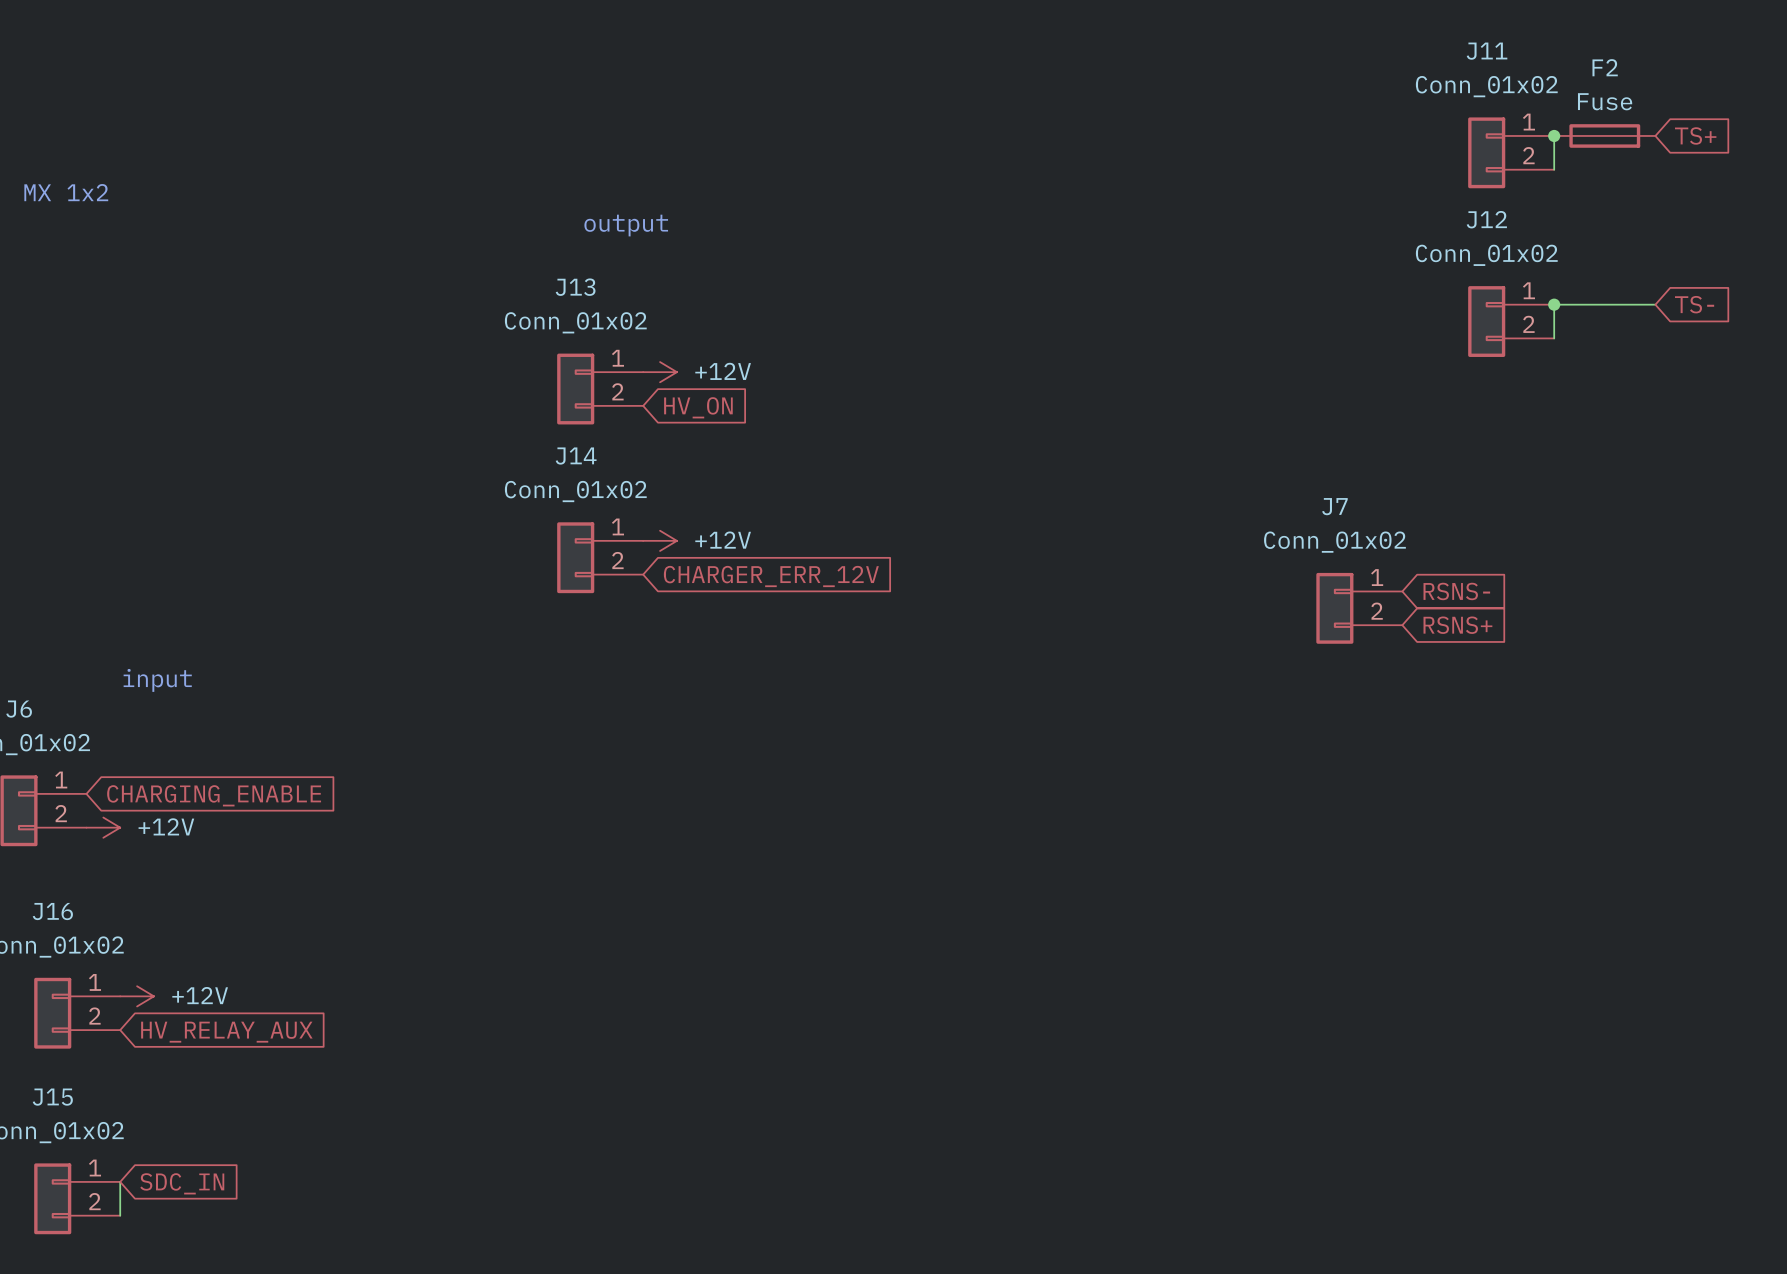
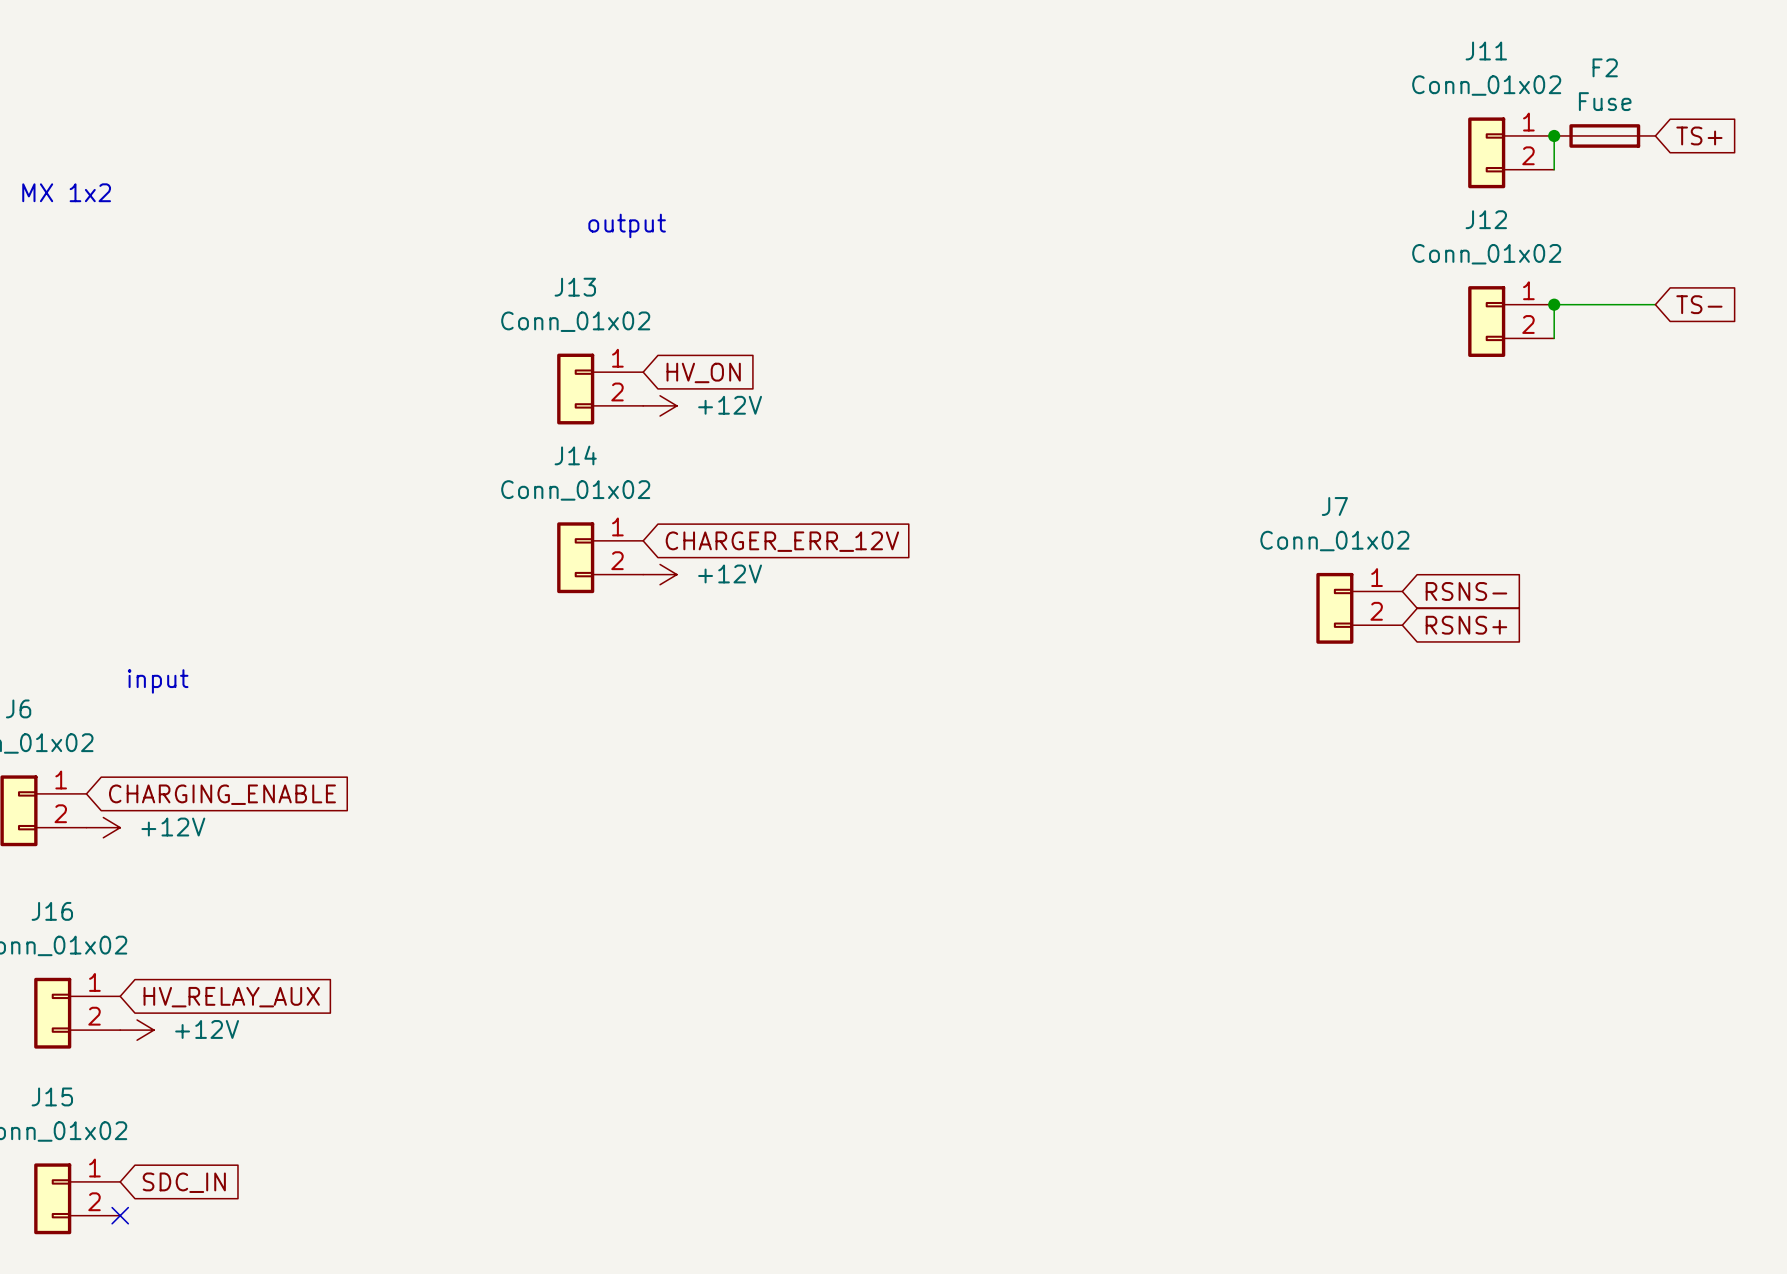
power symbol position: +12V (660, 372) -> +12V (660, 405)
global label position: HV_ON (698, 407) -> HV_ON (703, 372)
power symbol position: +12V (660, 540) -> +12V (660, 574)
global label position: CHARGER_ERR_12V (771, 576) -> CHARGER_ERR_12V (782, 541)
power symbol position: +12V (137, 996) -> +12V (137, 1030)
global label position: HV_RELAY_AUX (226, 1032) -> HV_RELAY_AUX (231, 997)
wire: (120, 1181) (120, 1215) -> none
no-connect mark: none -> (120, 1215)

